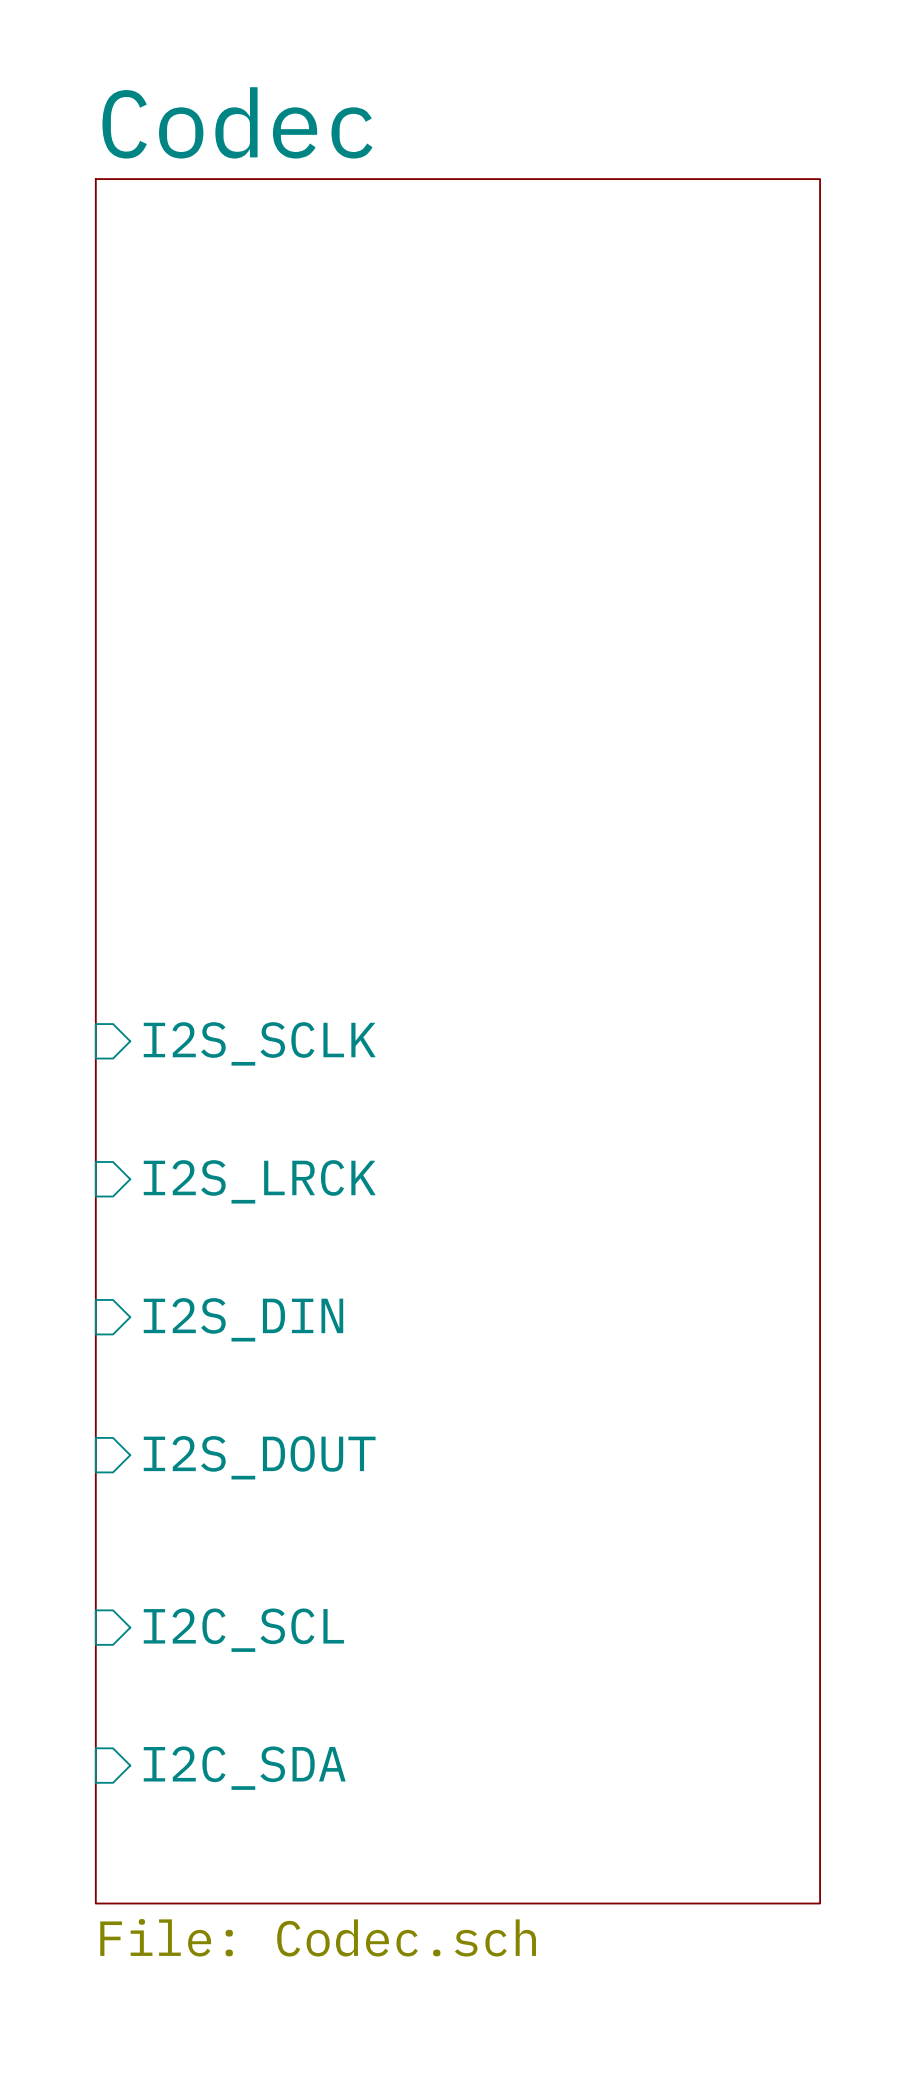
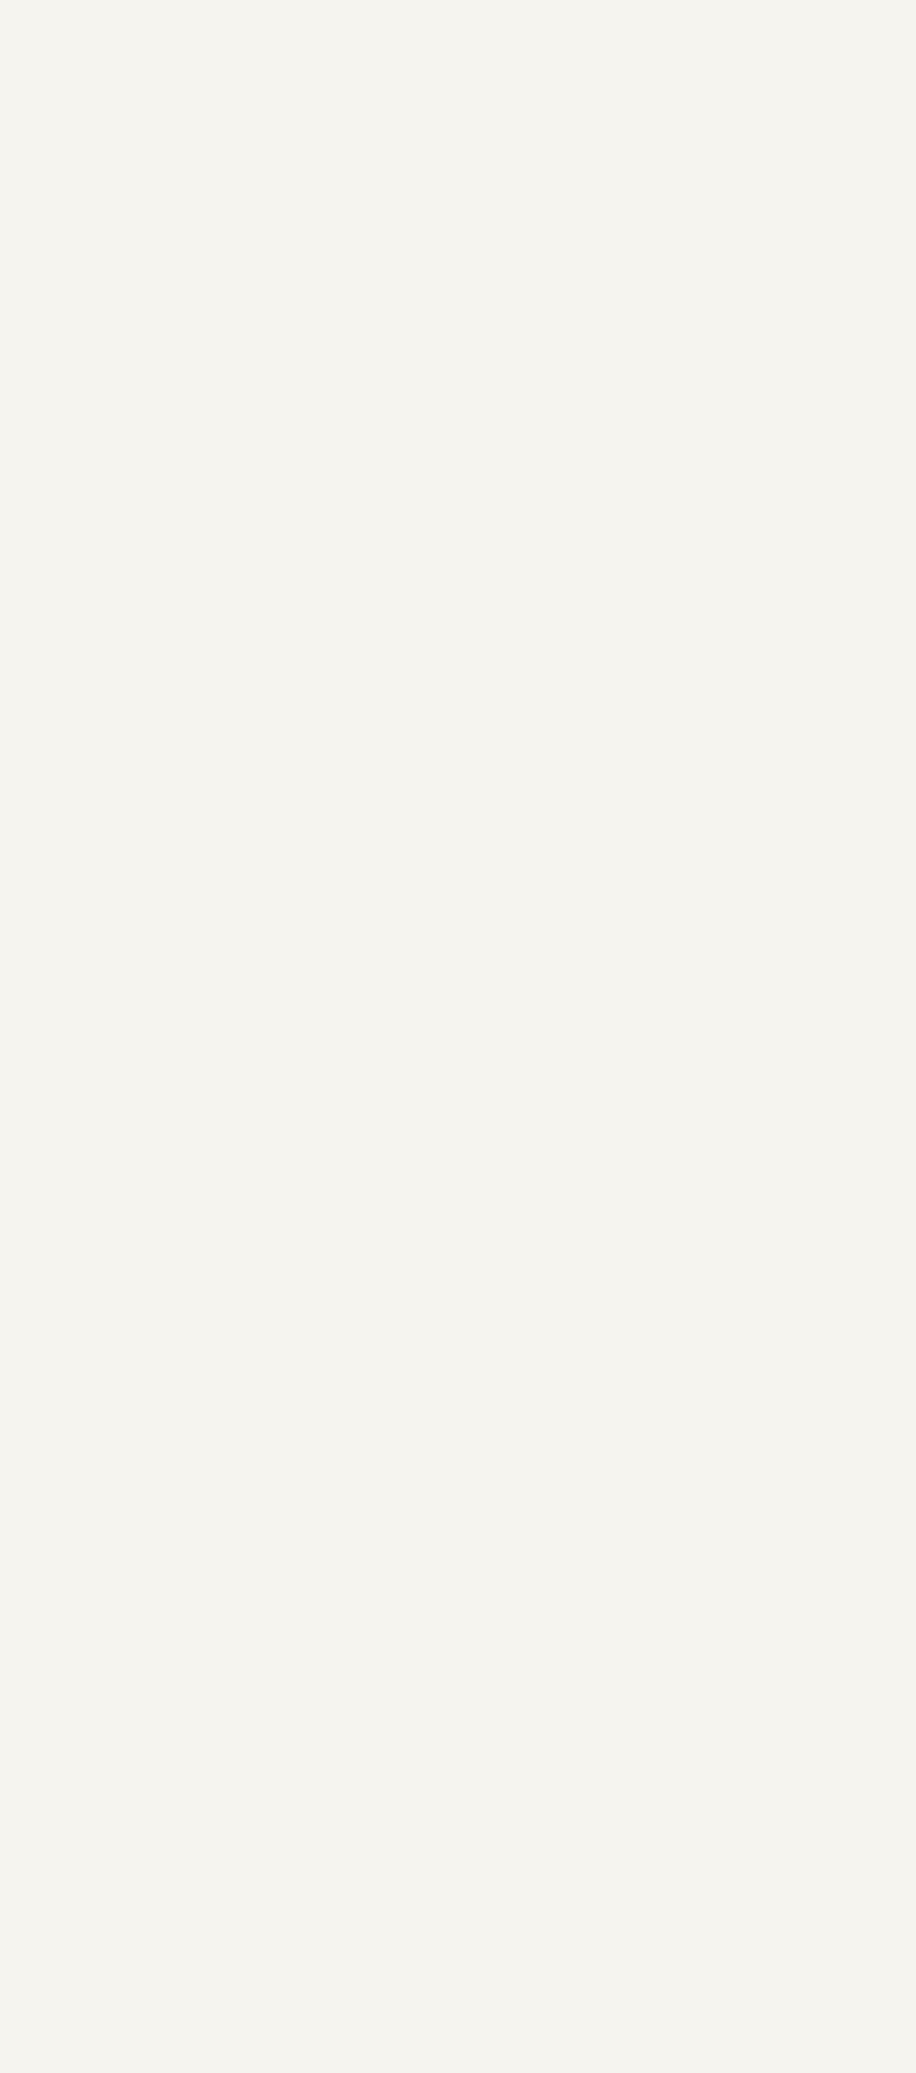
sheet Codec: File: Codec.sch (457, 1041) -> none
sheet pin: I2S_SCLK (259, 1043) -> none
sheet pin: I2S_LRCK (259, 1181) -> none
sheet pin: I2S_DIN (243, 1319) -> none
sheet pin: I2S_DOUT (259, 1457) -> none
sheet pin: I2C_SCL (243, 1630) -> none
sheet pin: I2C_SDA (244, 1768) -> none

